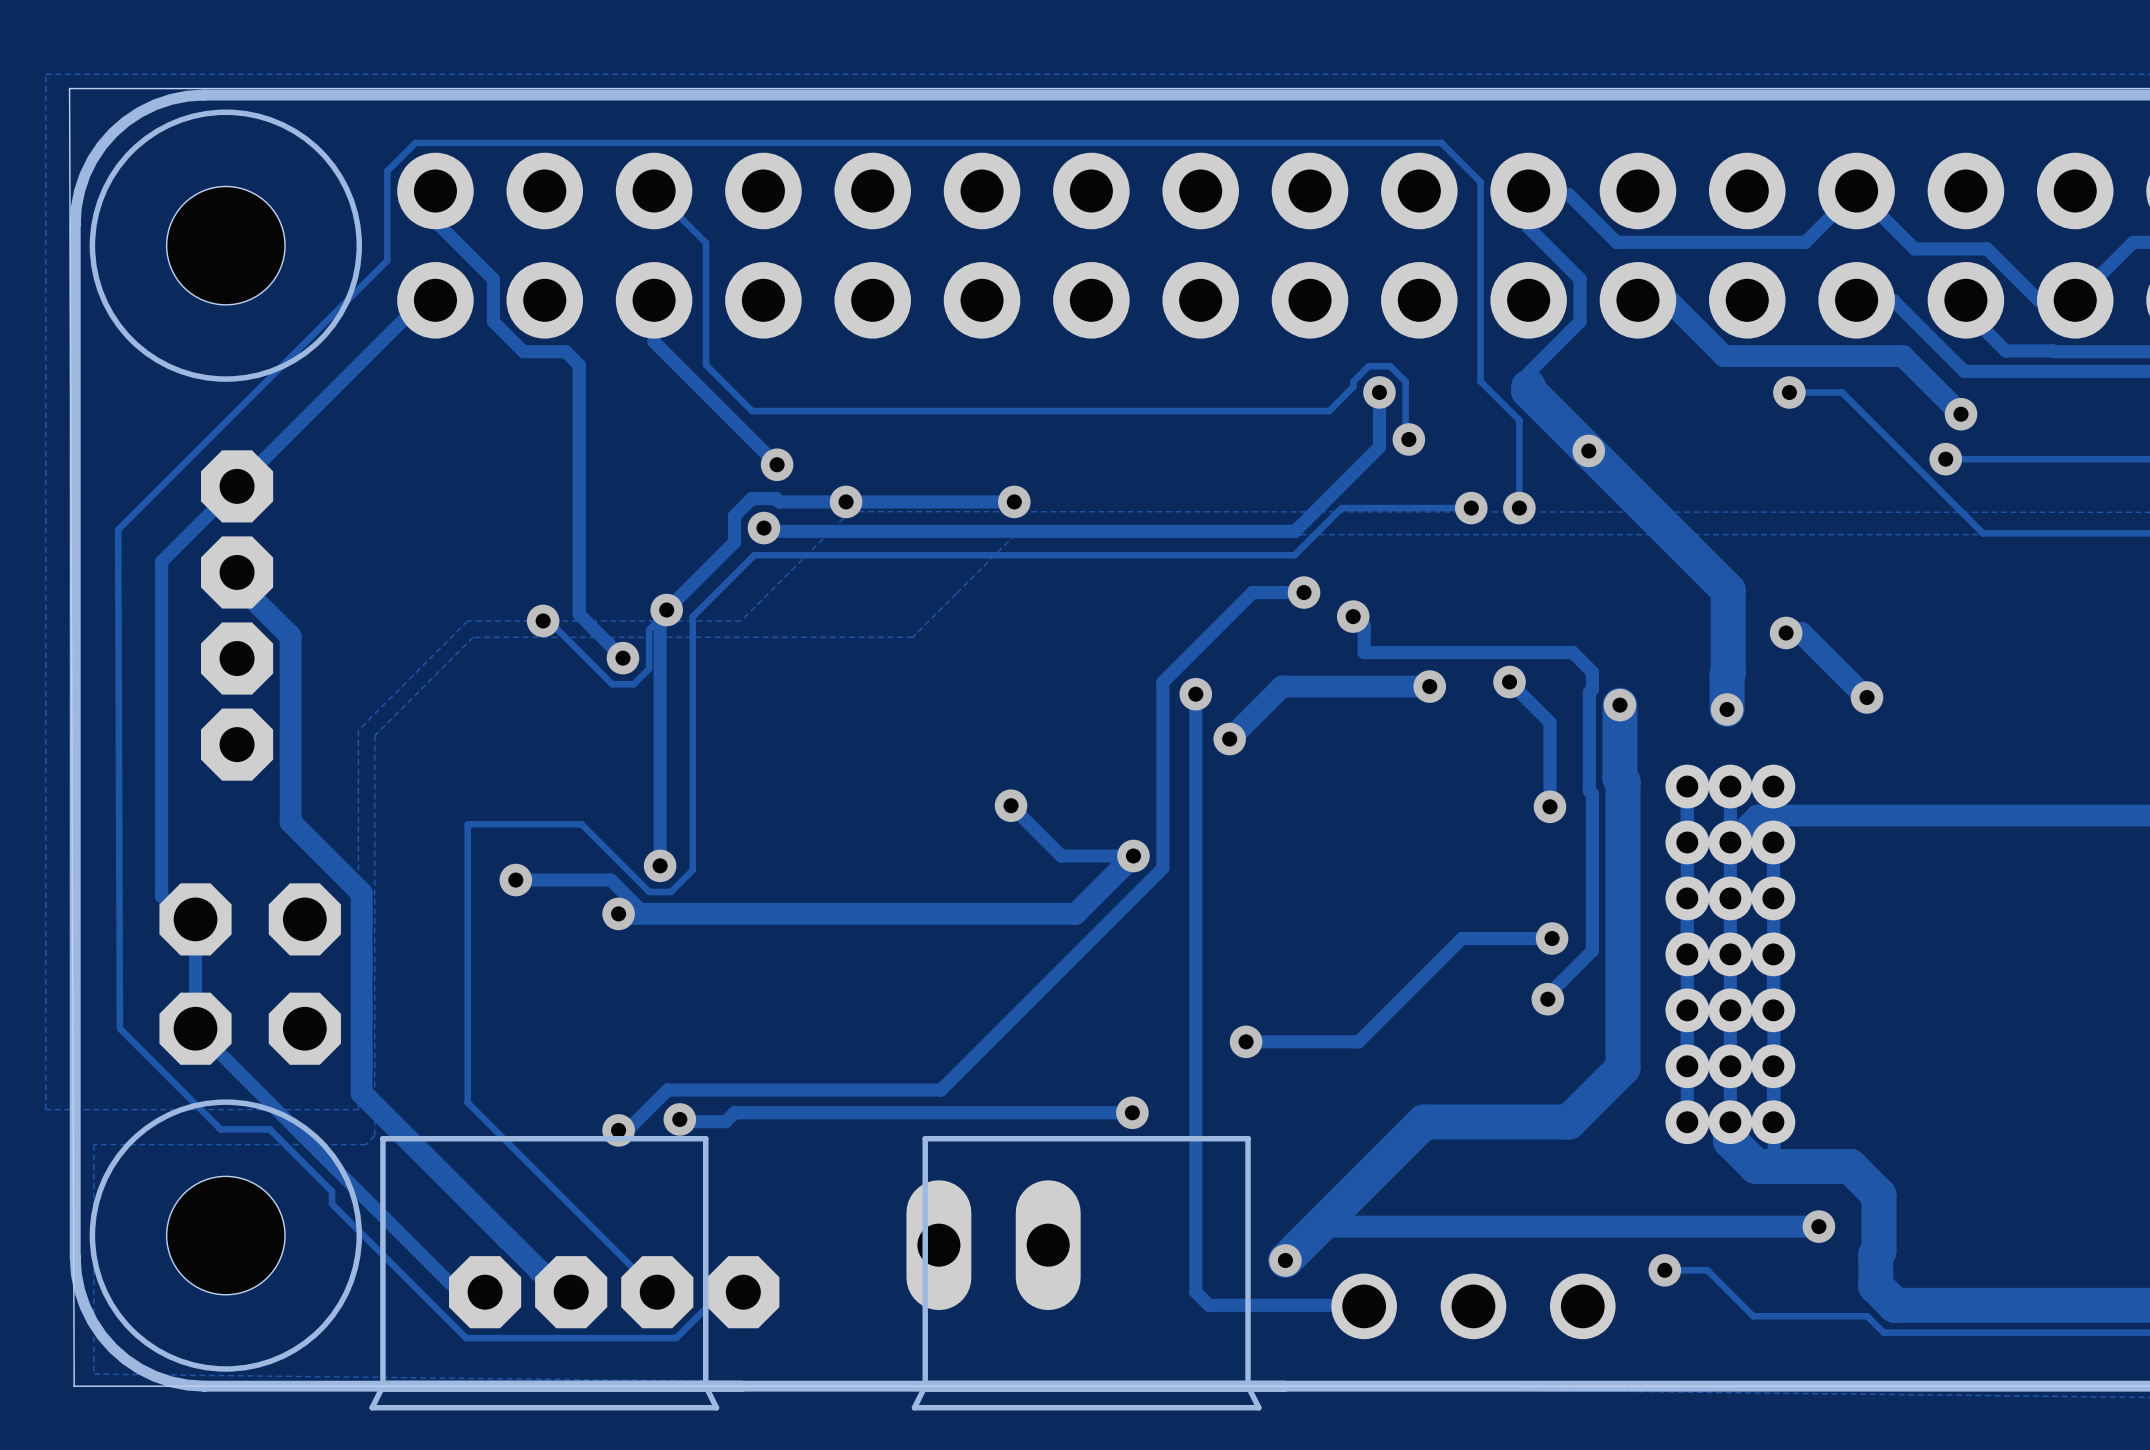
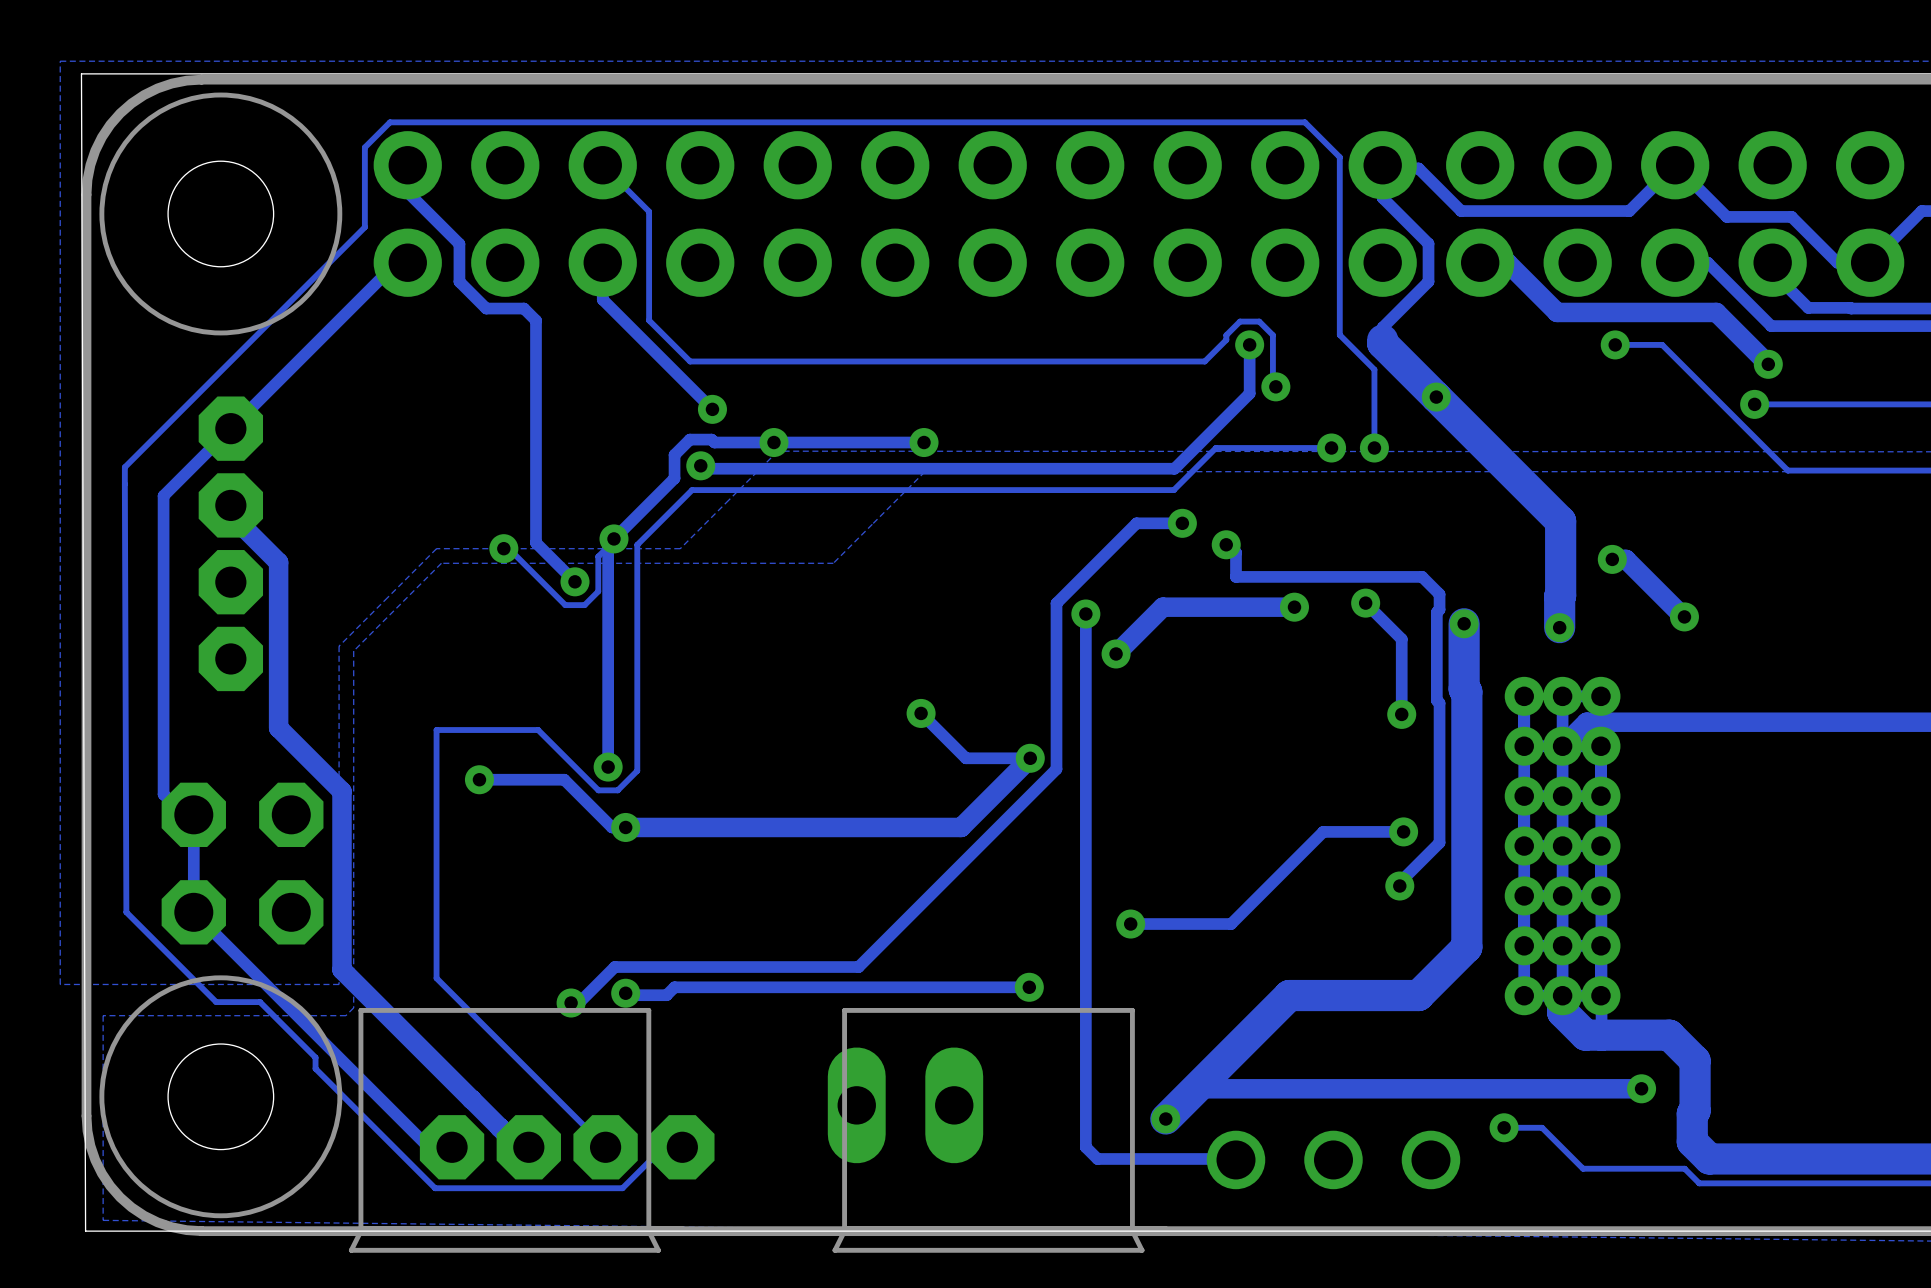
via position: (618, 913) -> (625, 827)
track: (1075, 913) (618, 913) (644, 913) -> (978, 809) (961, 827) (612, 827) (594, 809)

